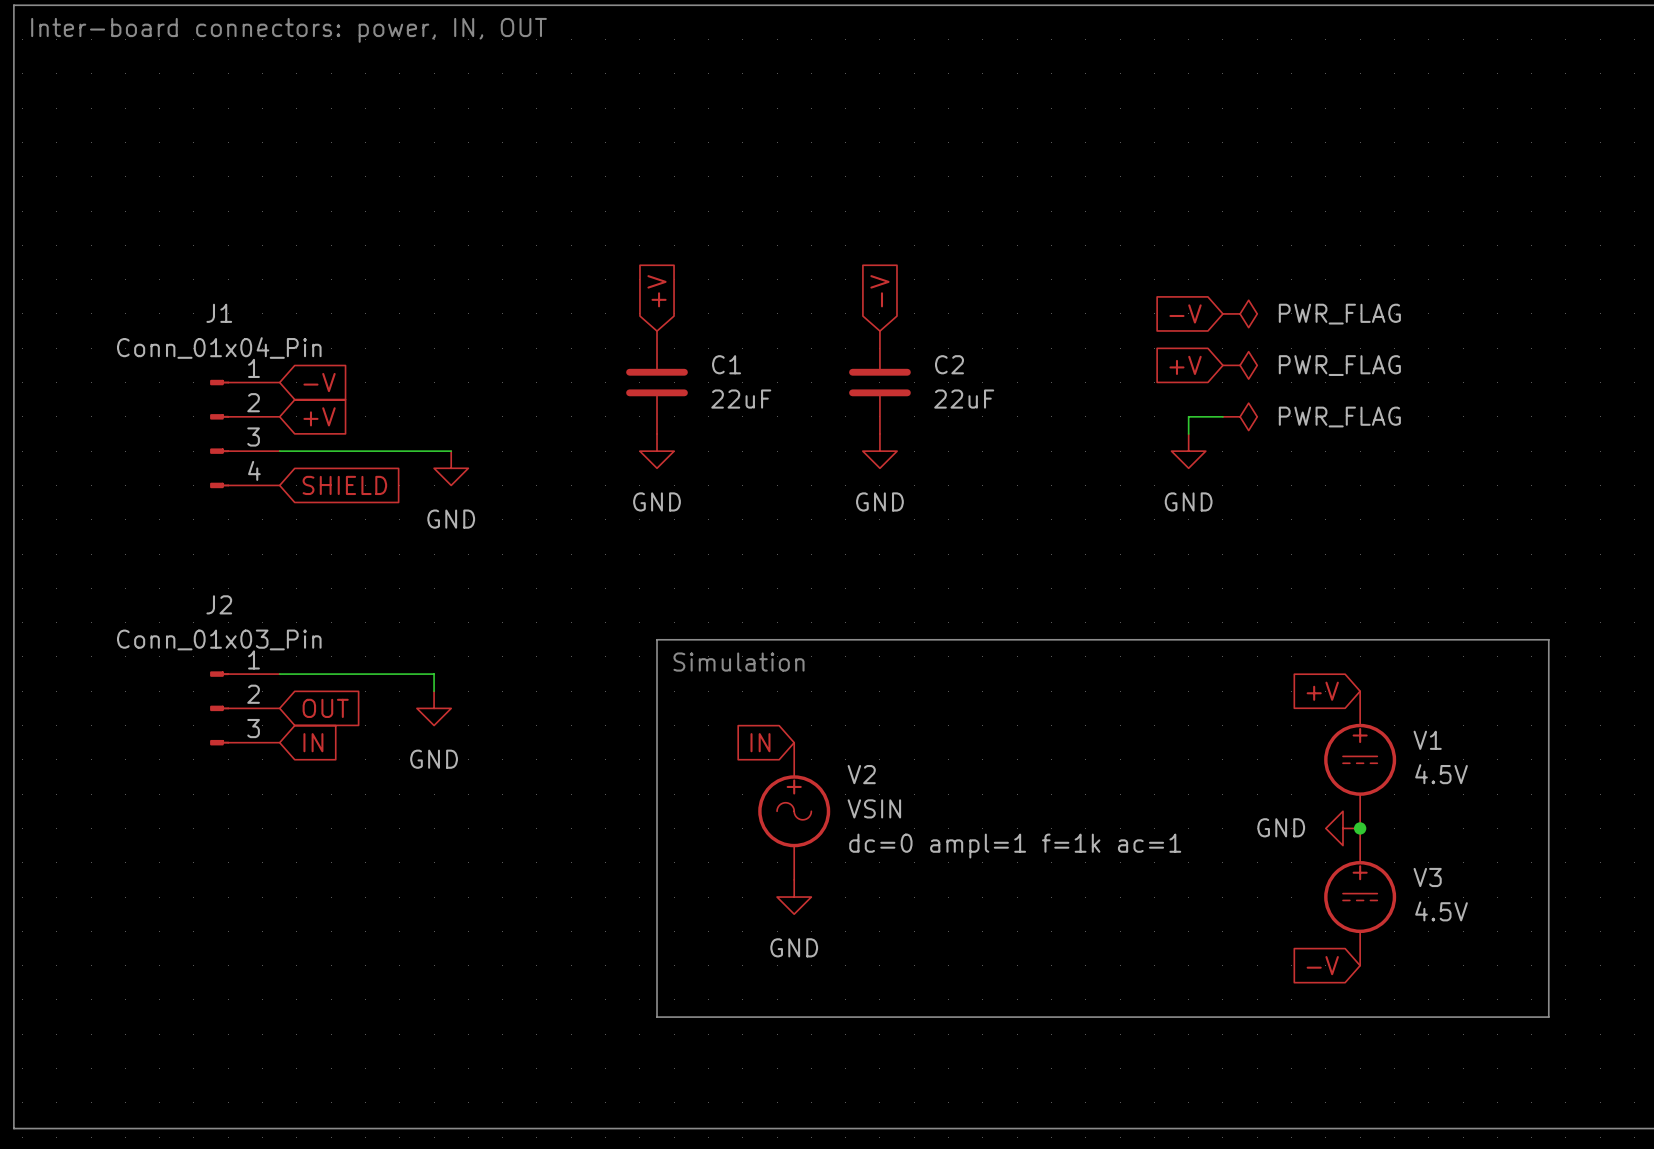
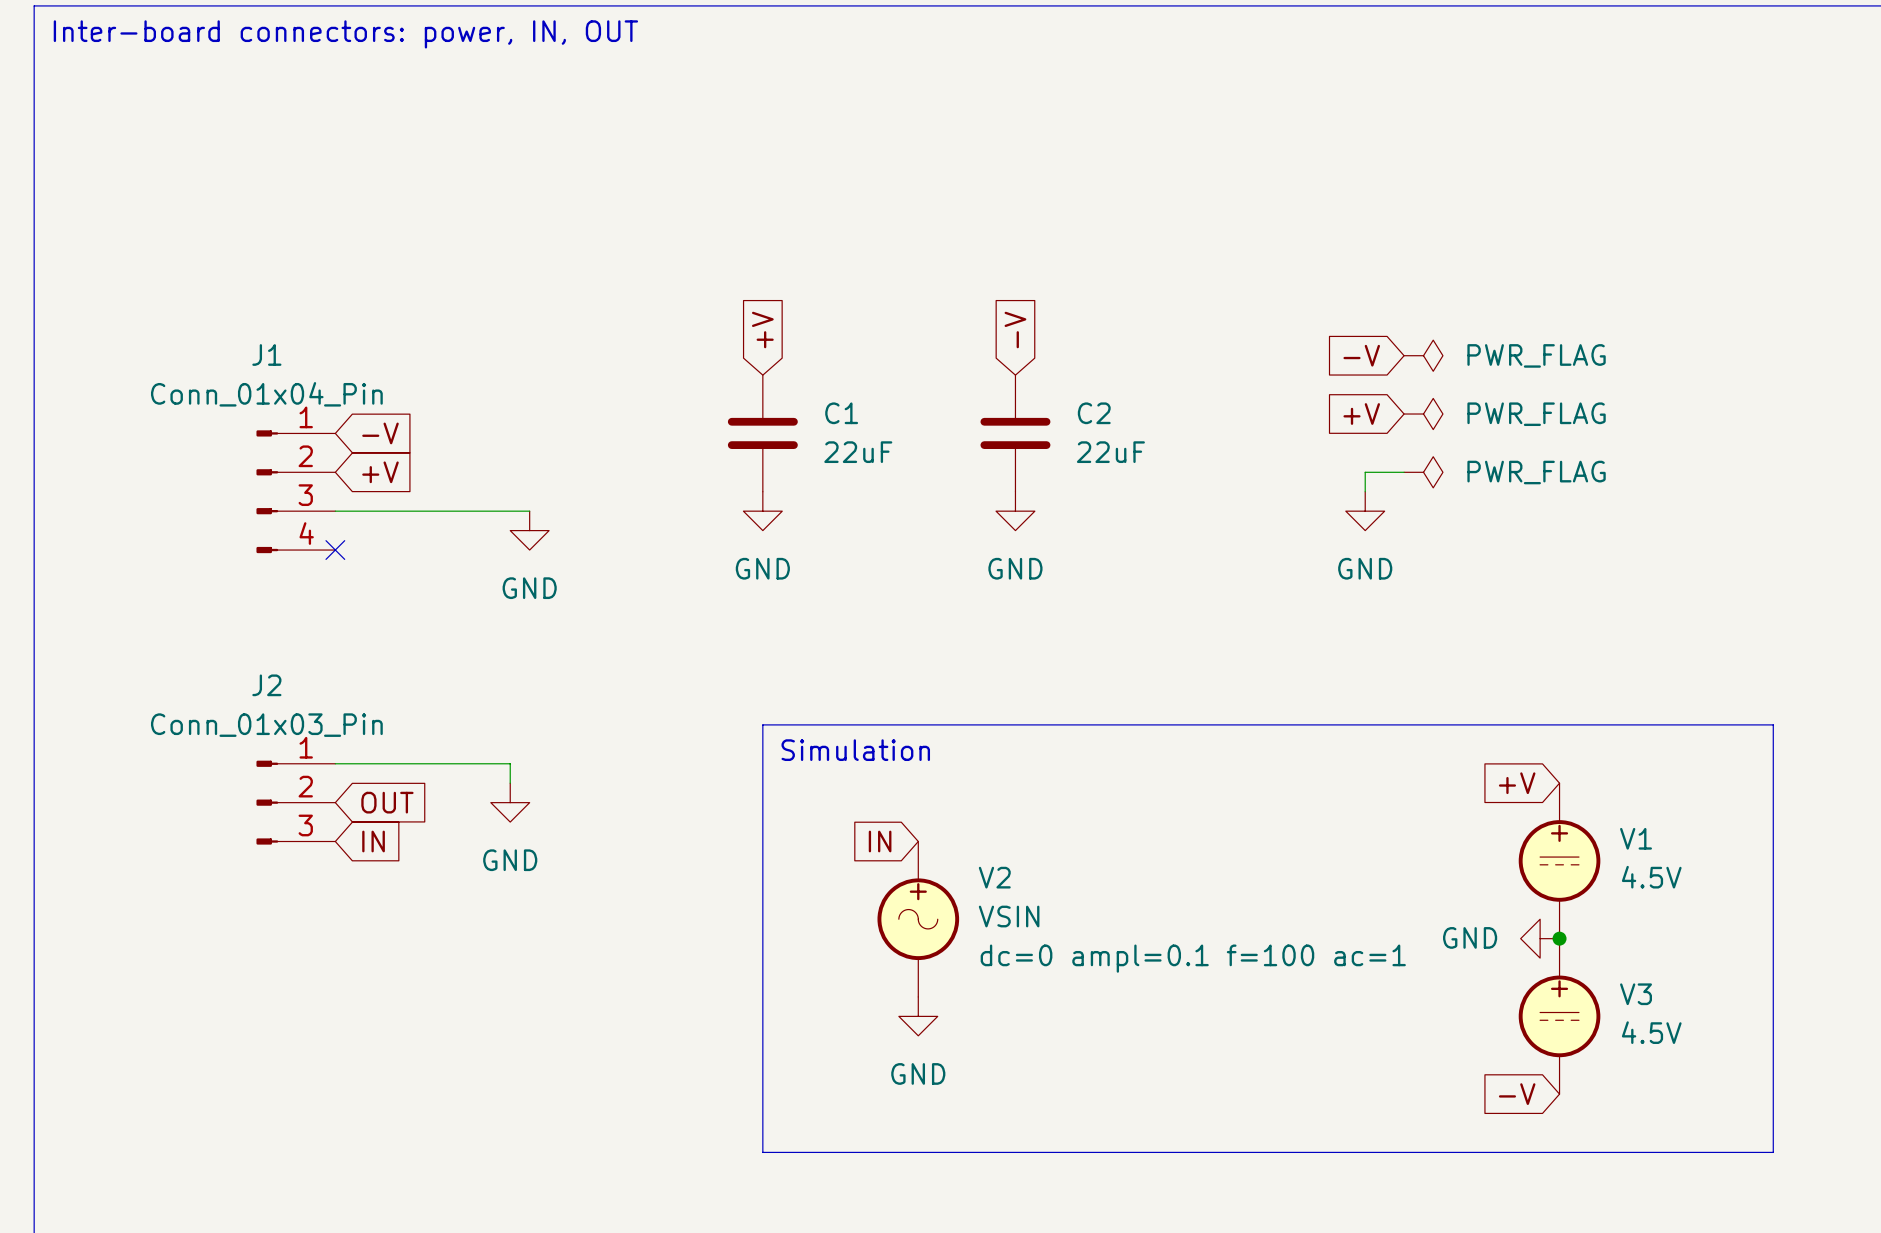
no-connect mark: none -> (335, 550)
global label: SHIELD (344, 485) -> none
V2 text: dc=0 ampl=1 f=1k ac=1 (1015, 846) -> dc=0 ampl=0.1 f=100 ac=1 (1193, 958)

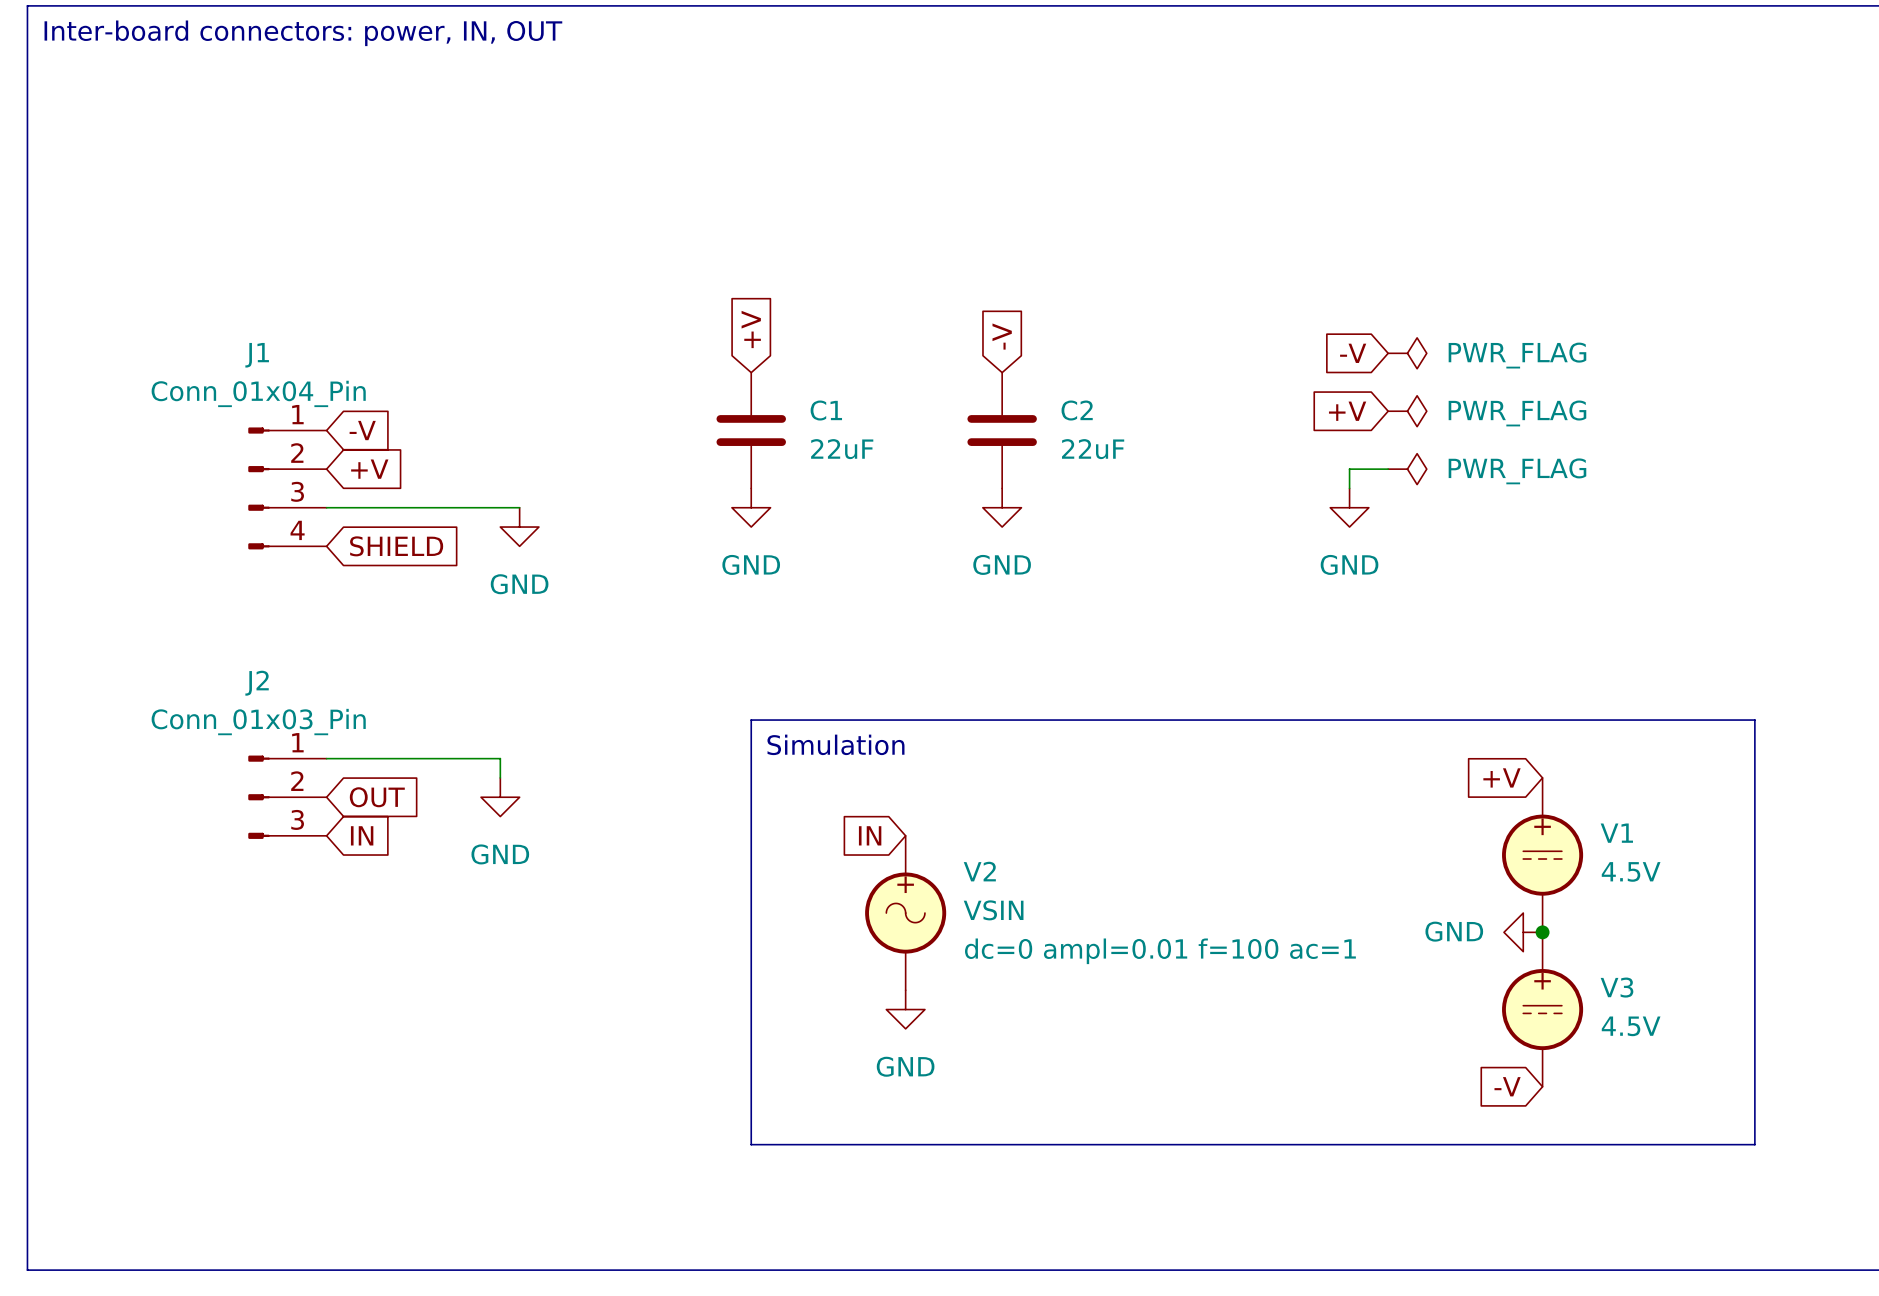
no-connect mark: (335, 550) -> none
global label: none -> SHIELD (396, 546)
V2 text: dc=0 ampl=0.1 f=100 ac=1 (1193, 958) -> dc=0 ampl=0.01 f=100 ac=1 (1160, 951)

